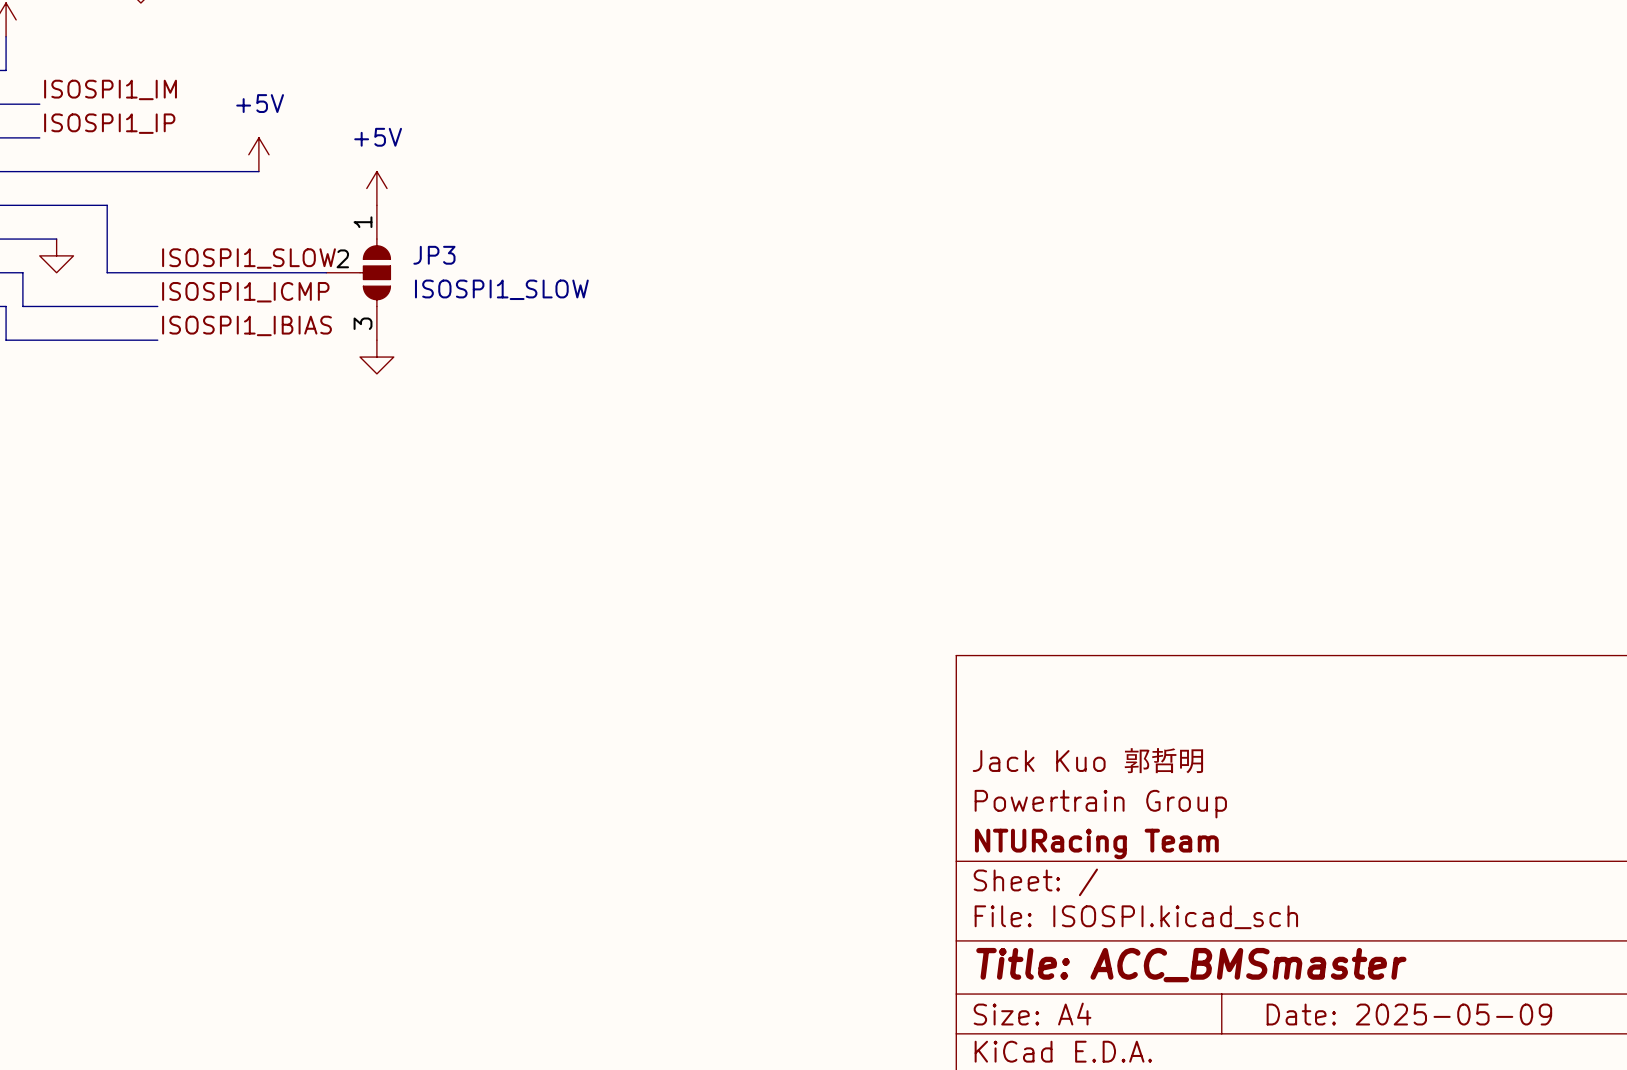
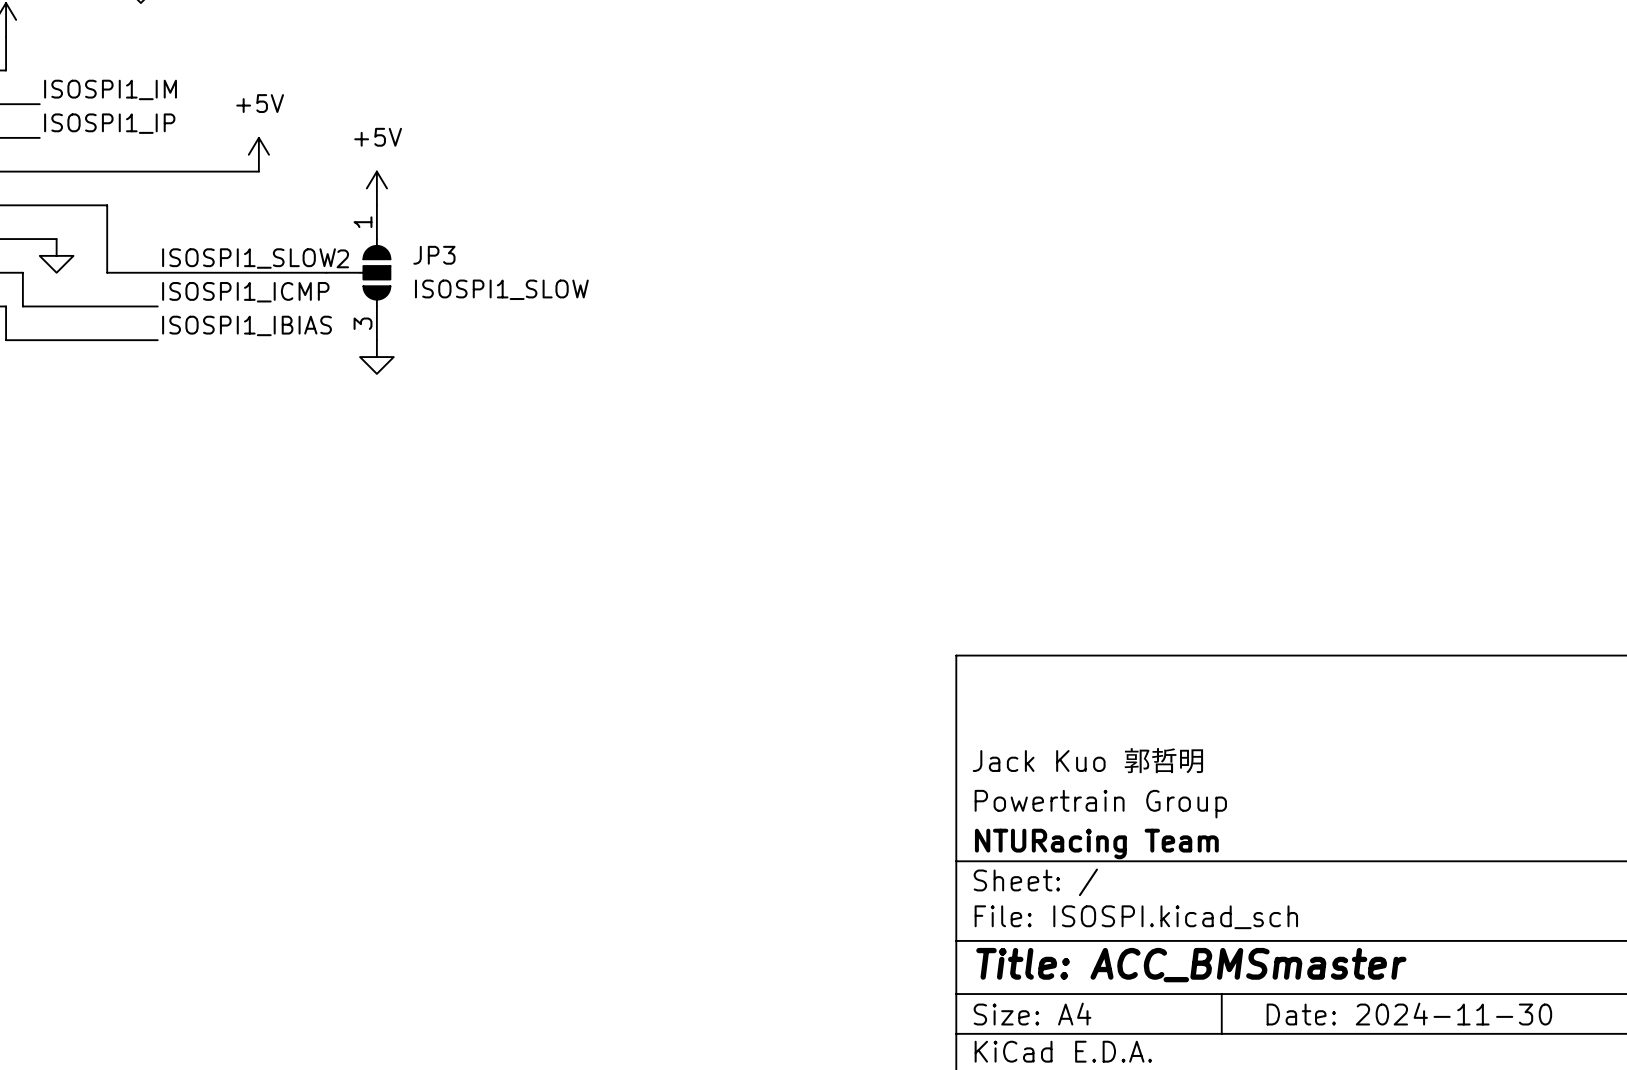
title block: Date: 2025-05-09 (1409, 1014) -> Date: 2024-11-30 (1409, 1014)

